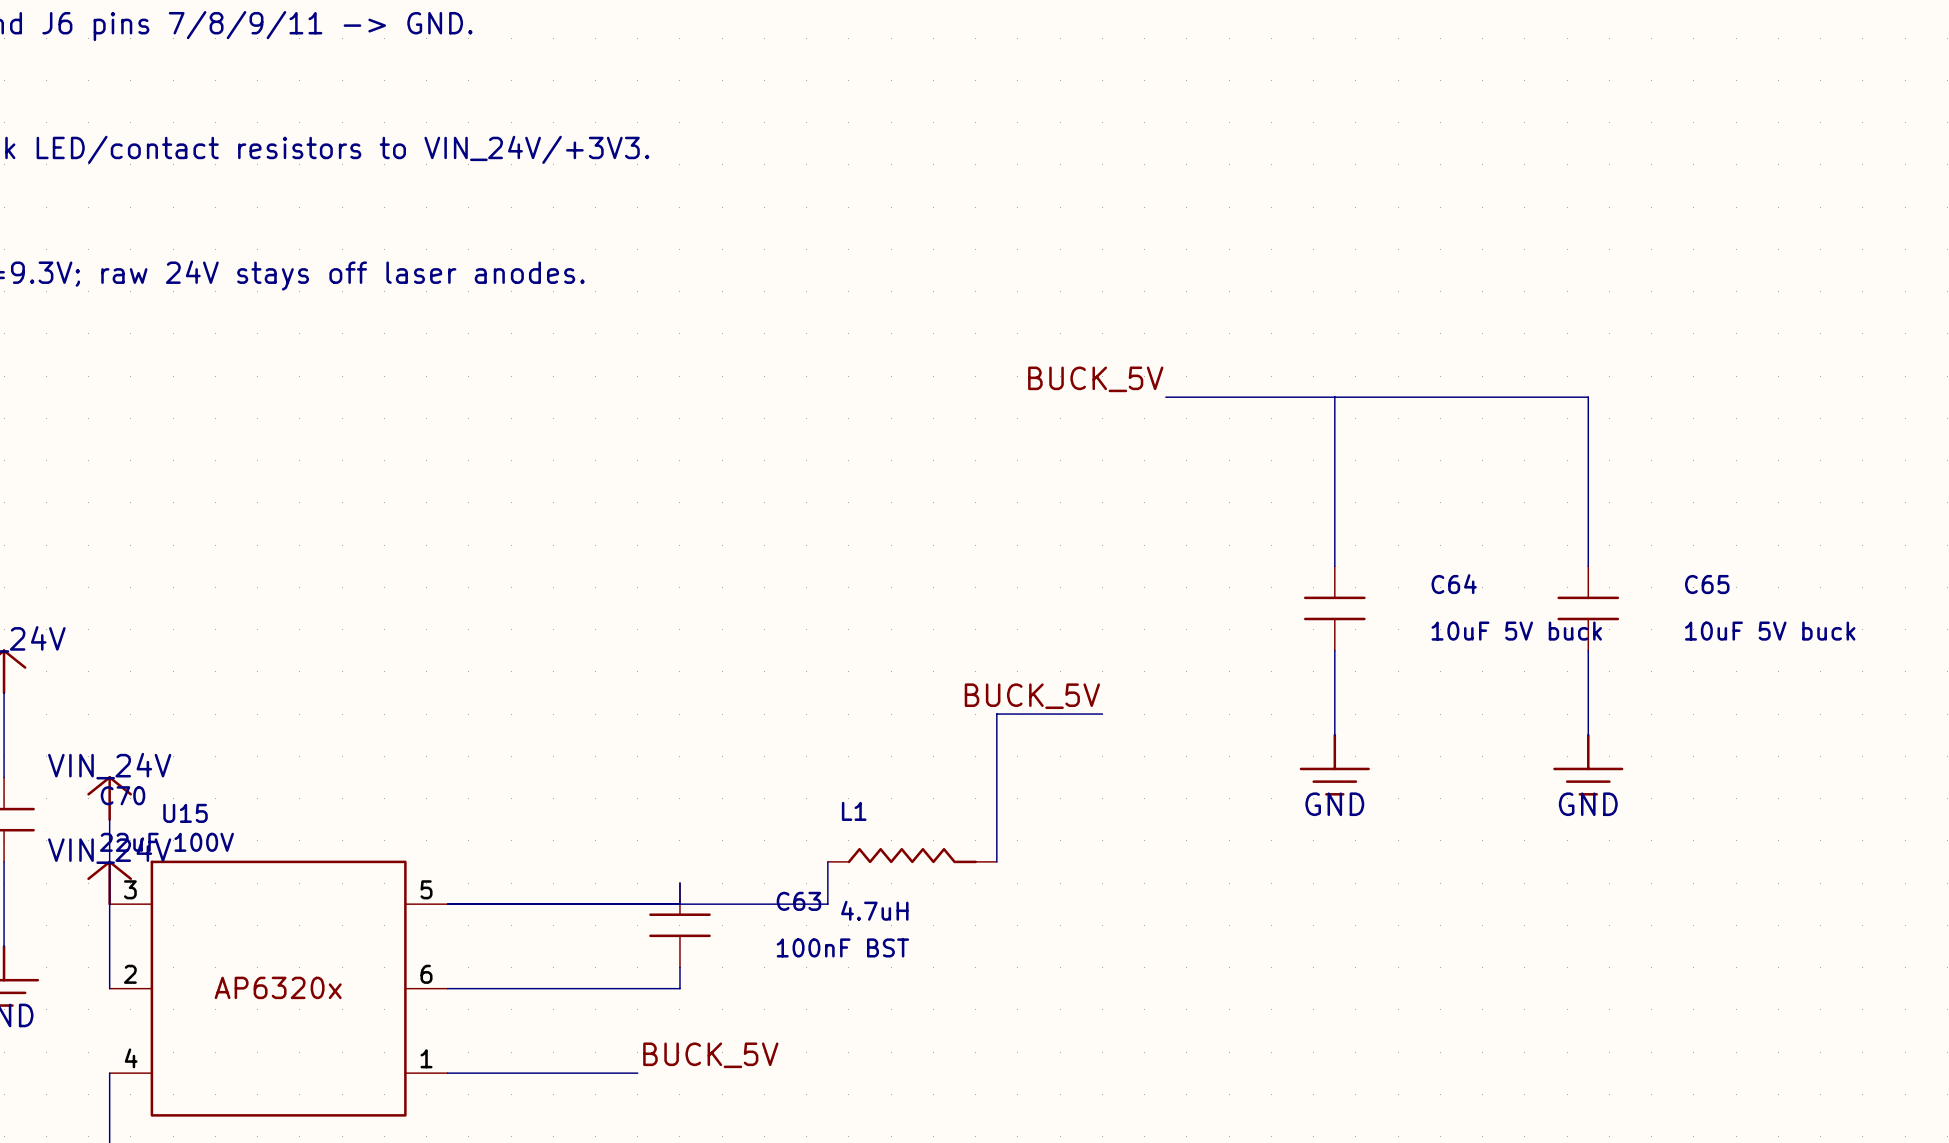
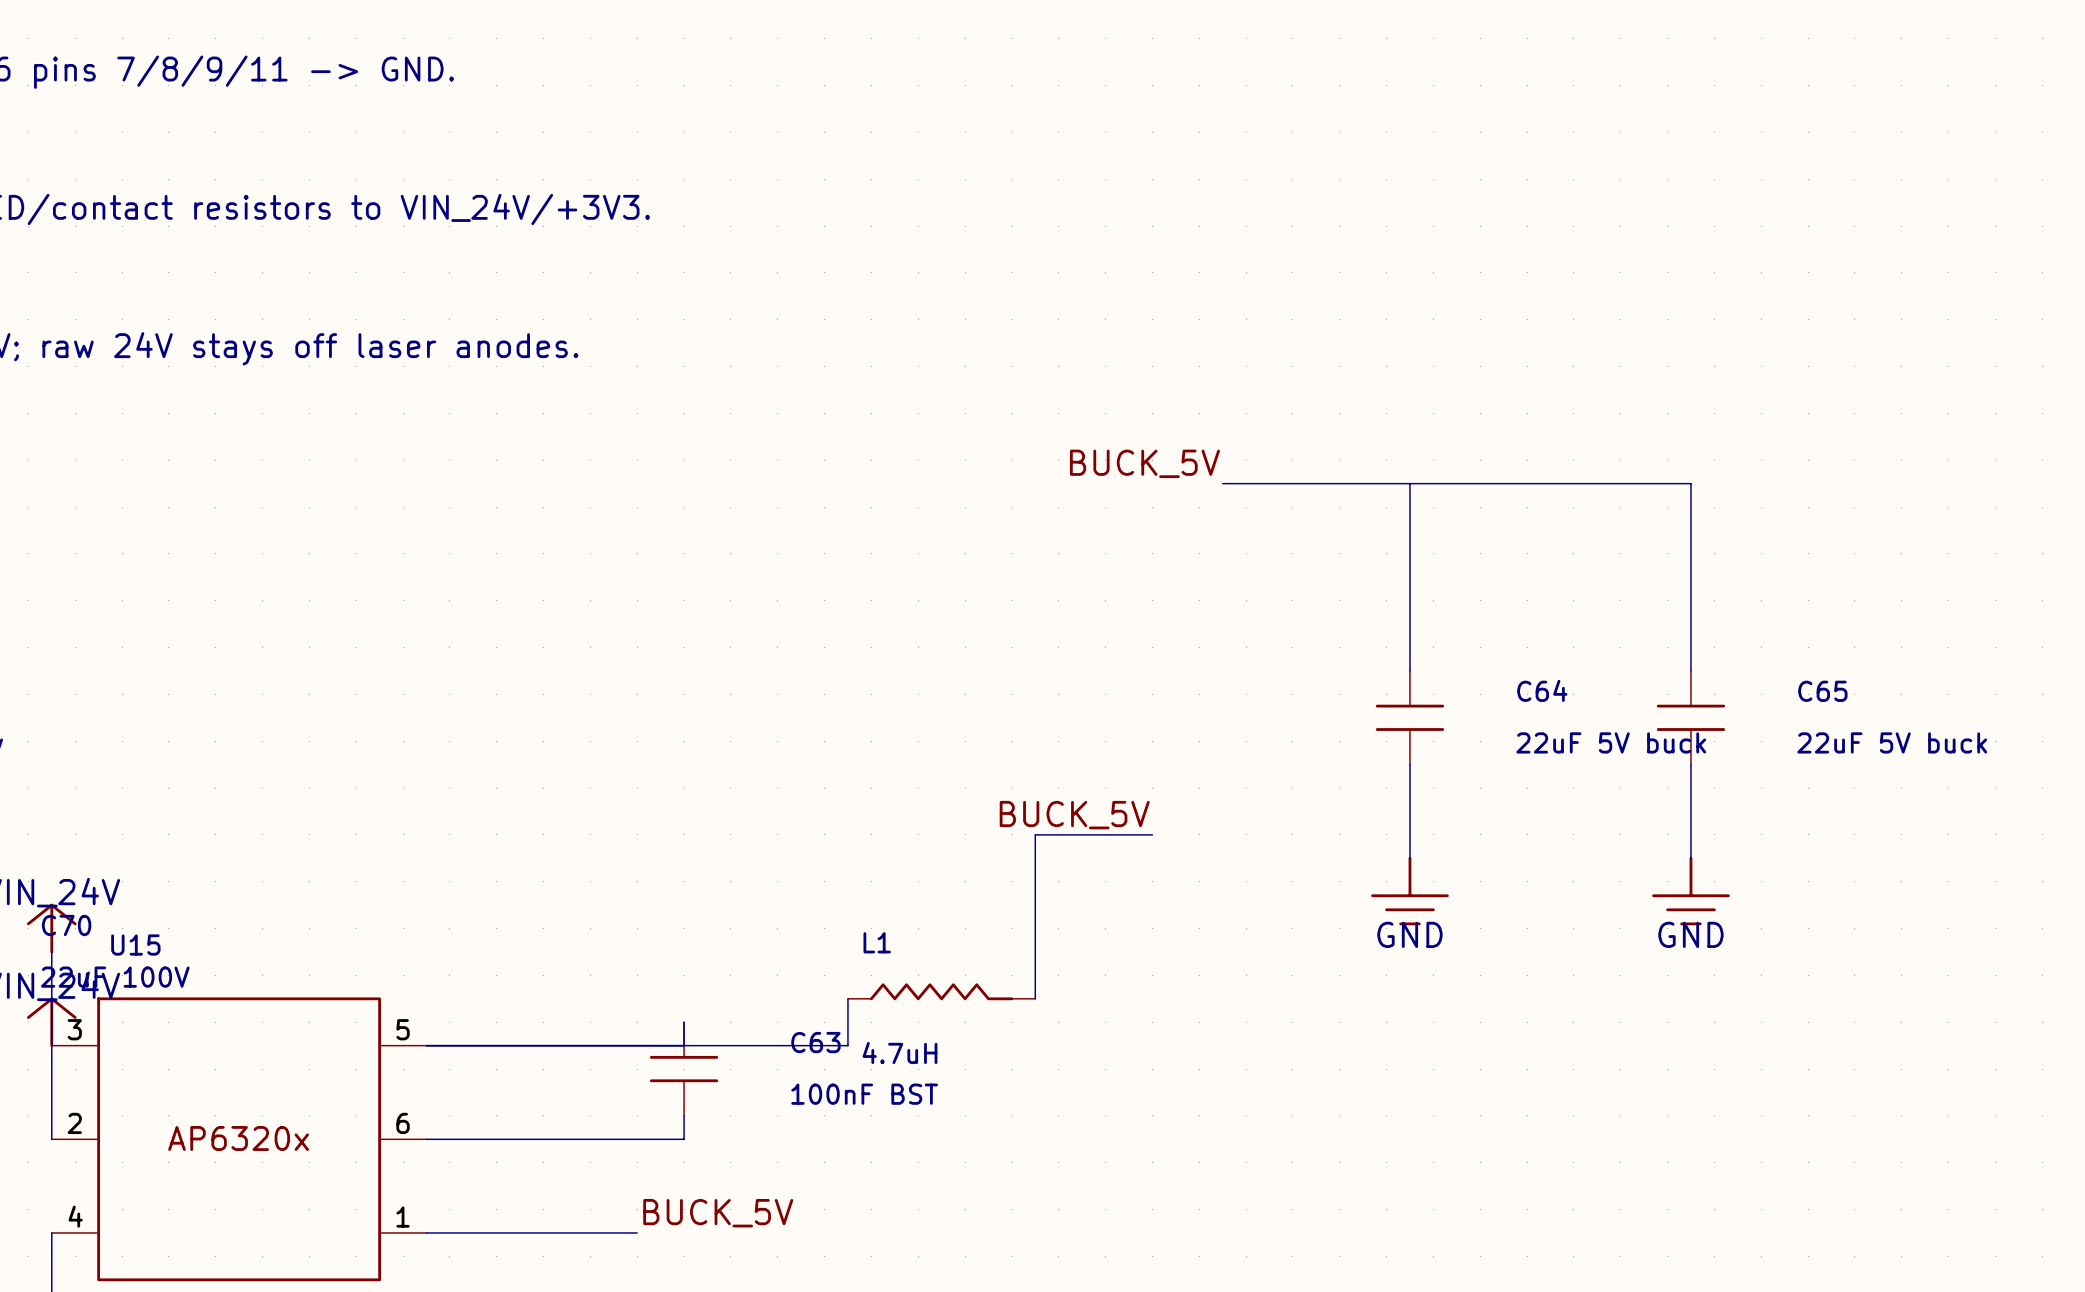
C64 value: 10uF 5V buck (1516, 631) -> 22uF 5V buck (1611, 742)
C65 value: 10uF 5V buck (1770, 631) -> 22uF 5V buck (1892, 742)

